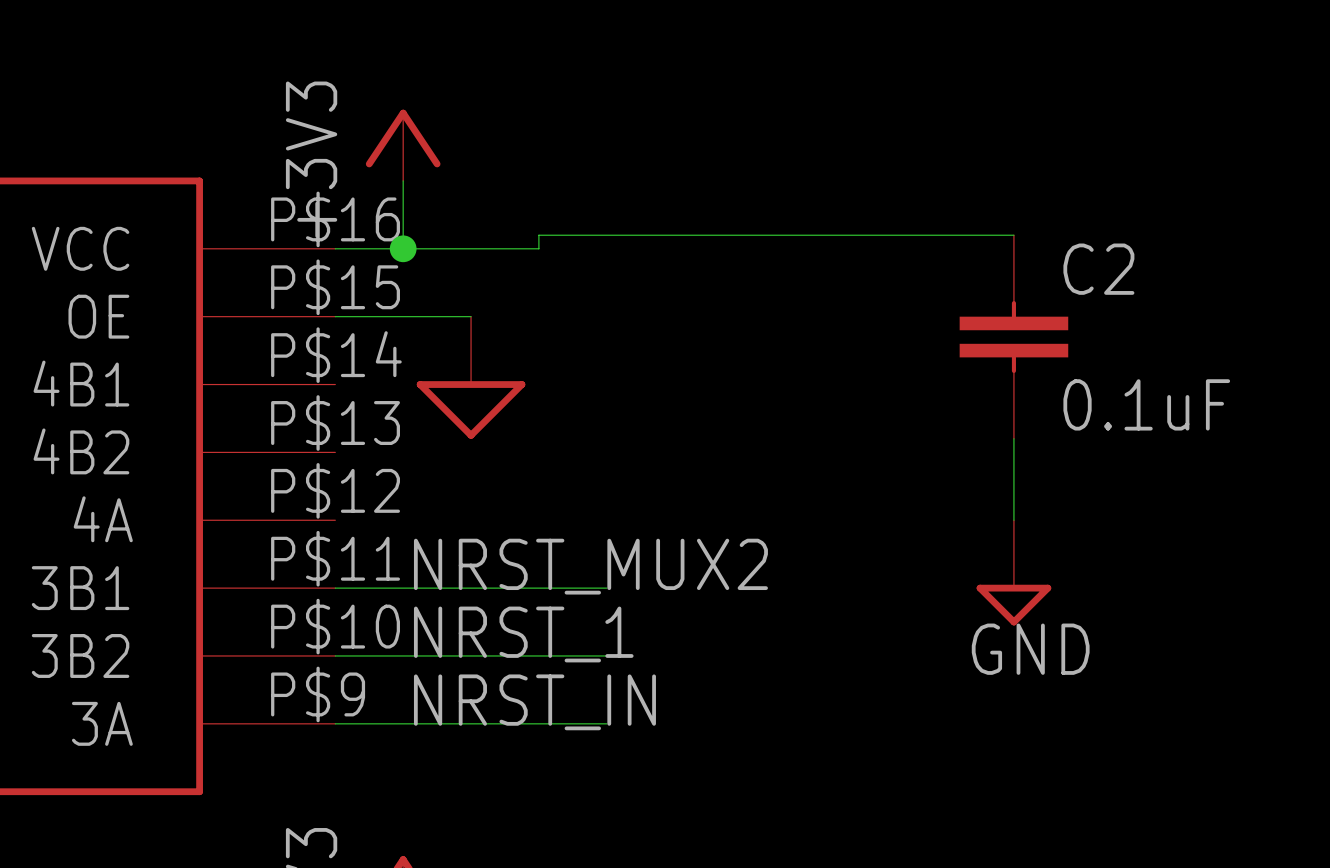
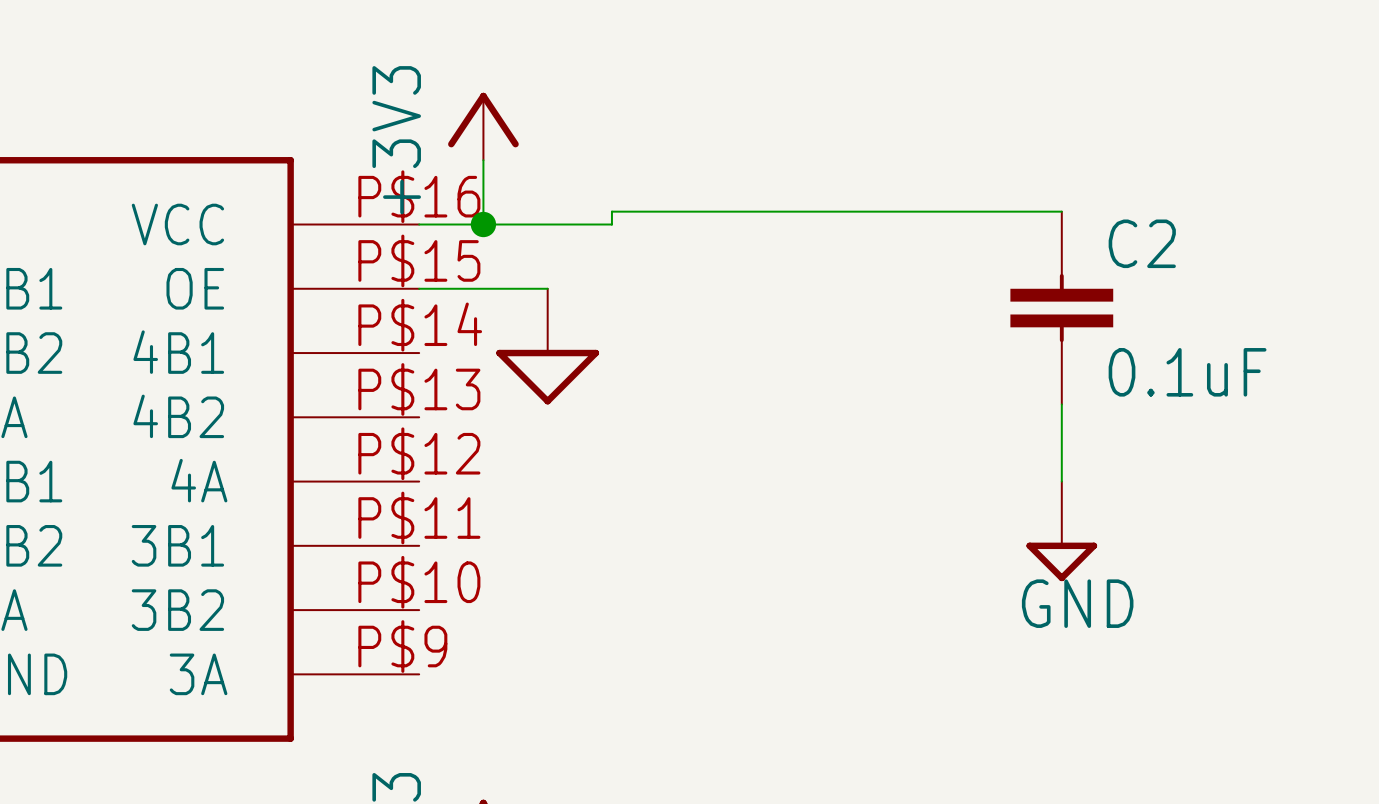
label: NRST_MUX2 (590, 566) -> none
wire: (335, 588) (606, 588) -> none
label: NRST_1 (523, 634) -> none
wire: (335, 655) (606, 655) -> none
label: NRST_IN (534, 702) -> none
wire: (335, 723) (606, 723) -> none

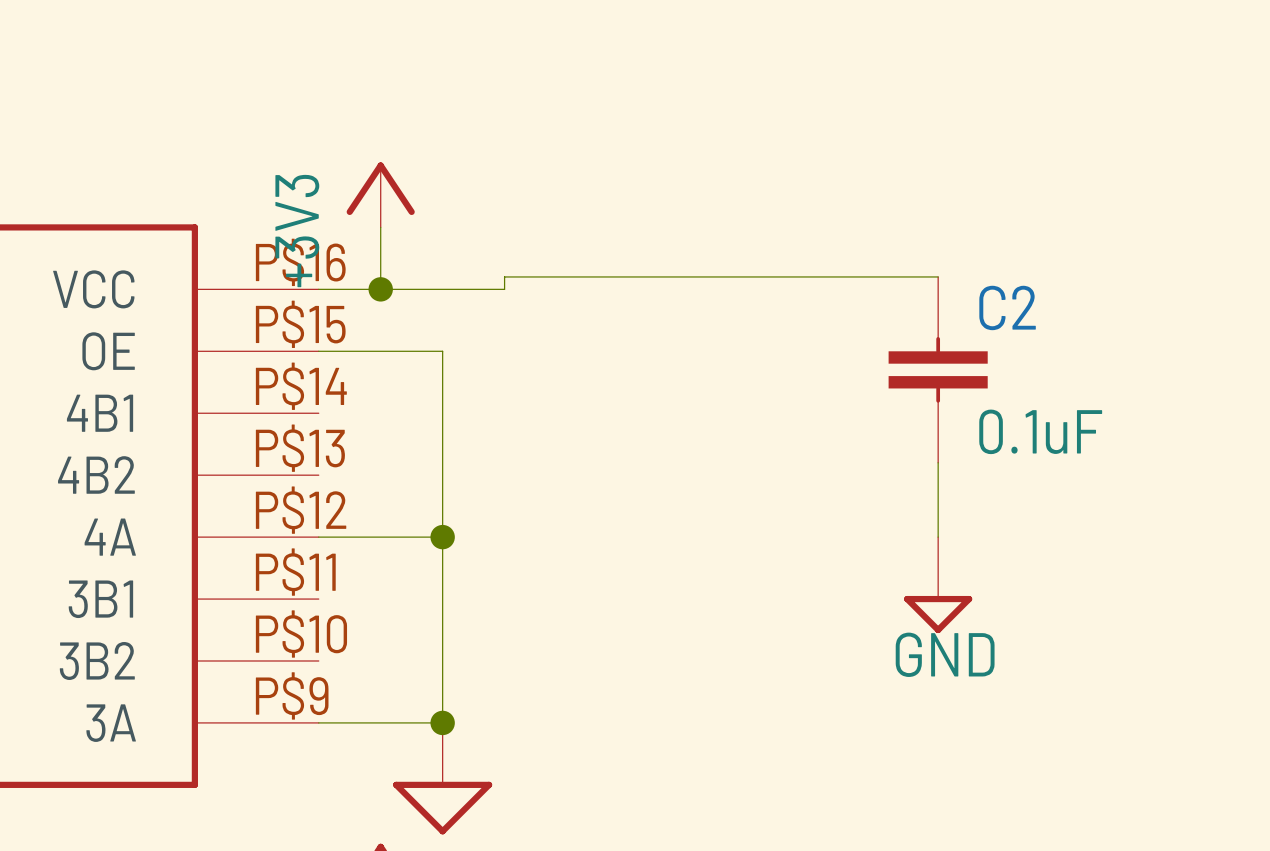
wire: none -> (442, 351) (442, 722) (318, 722)
power symbol position: (547, 346) -> (442, 778)
wire: none -> (318, 537) (442, 537)
junction: none -> (442, 537)
junction: none -> (442, 722)

